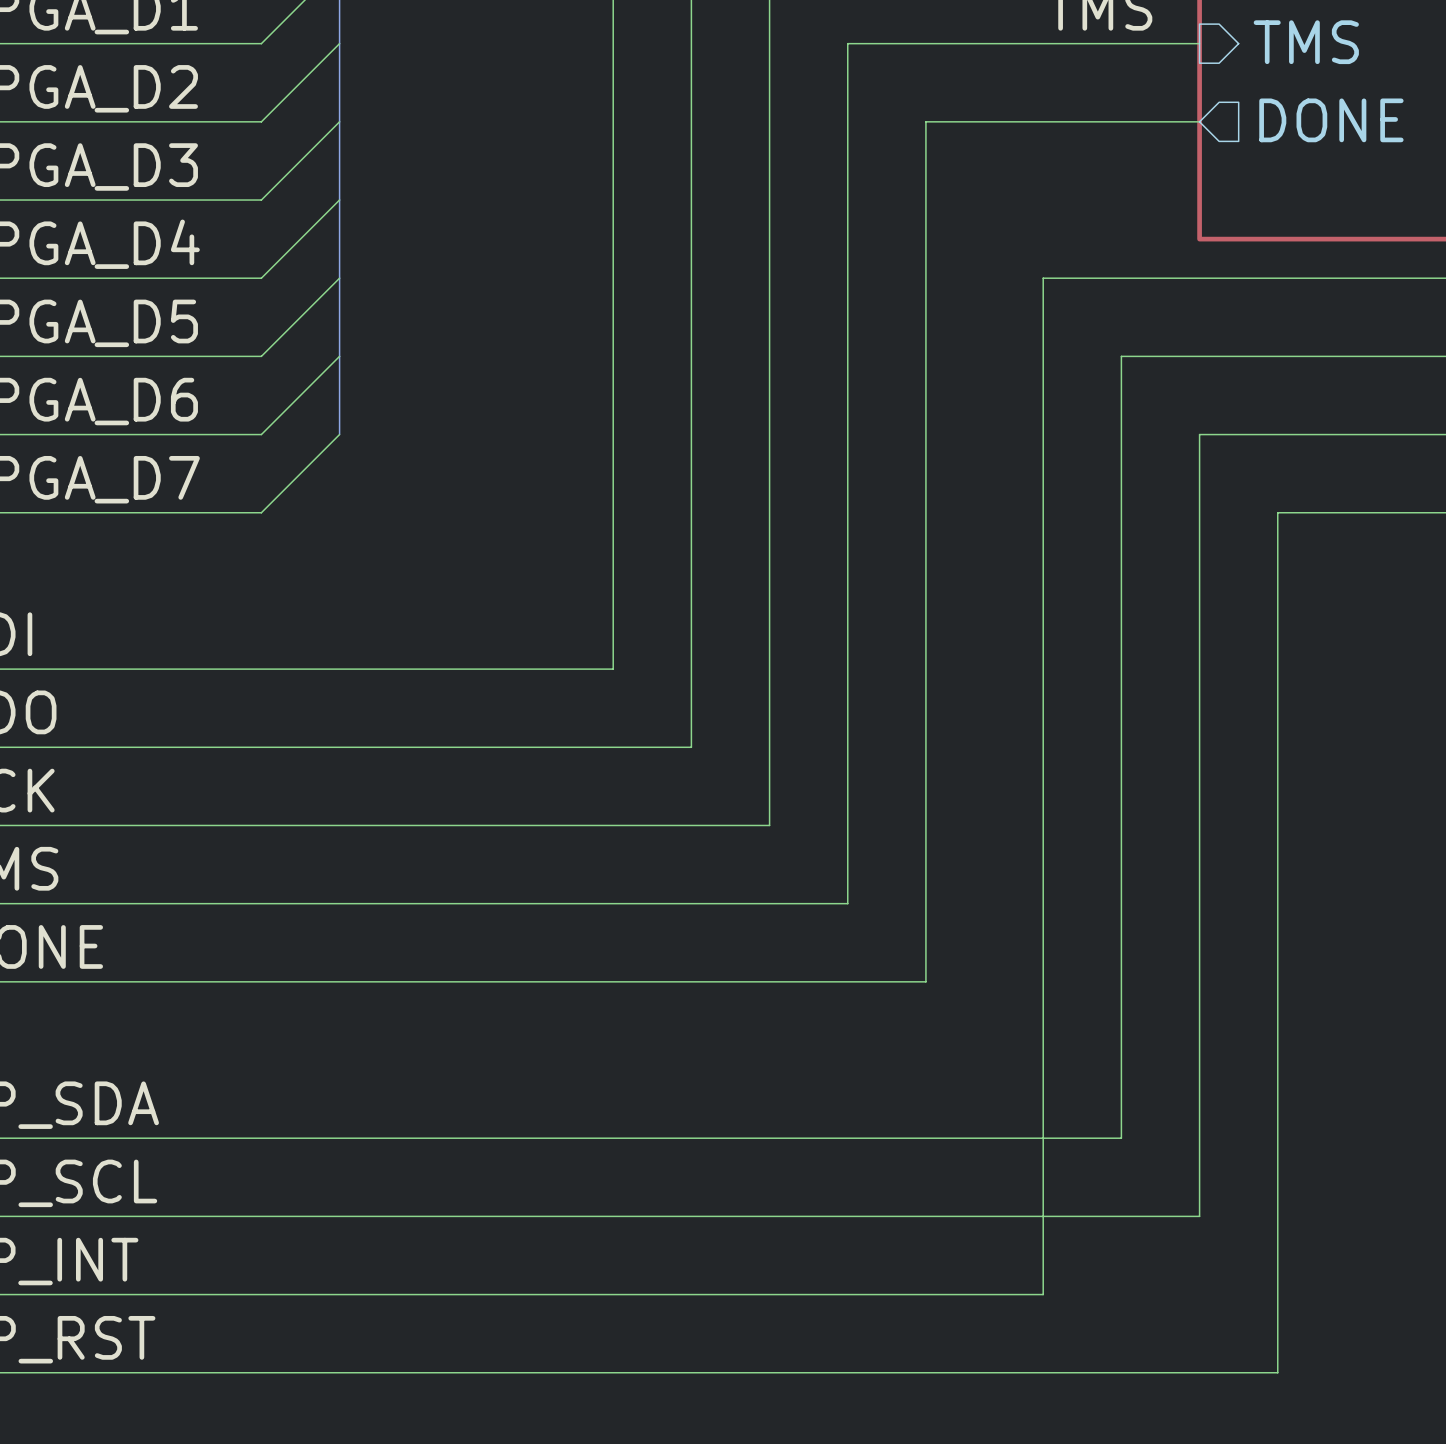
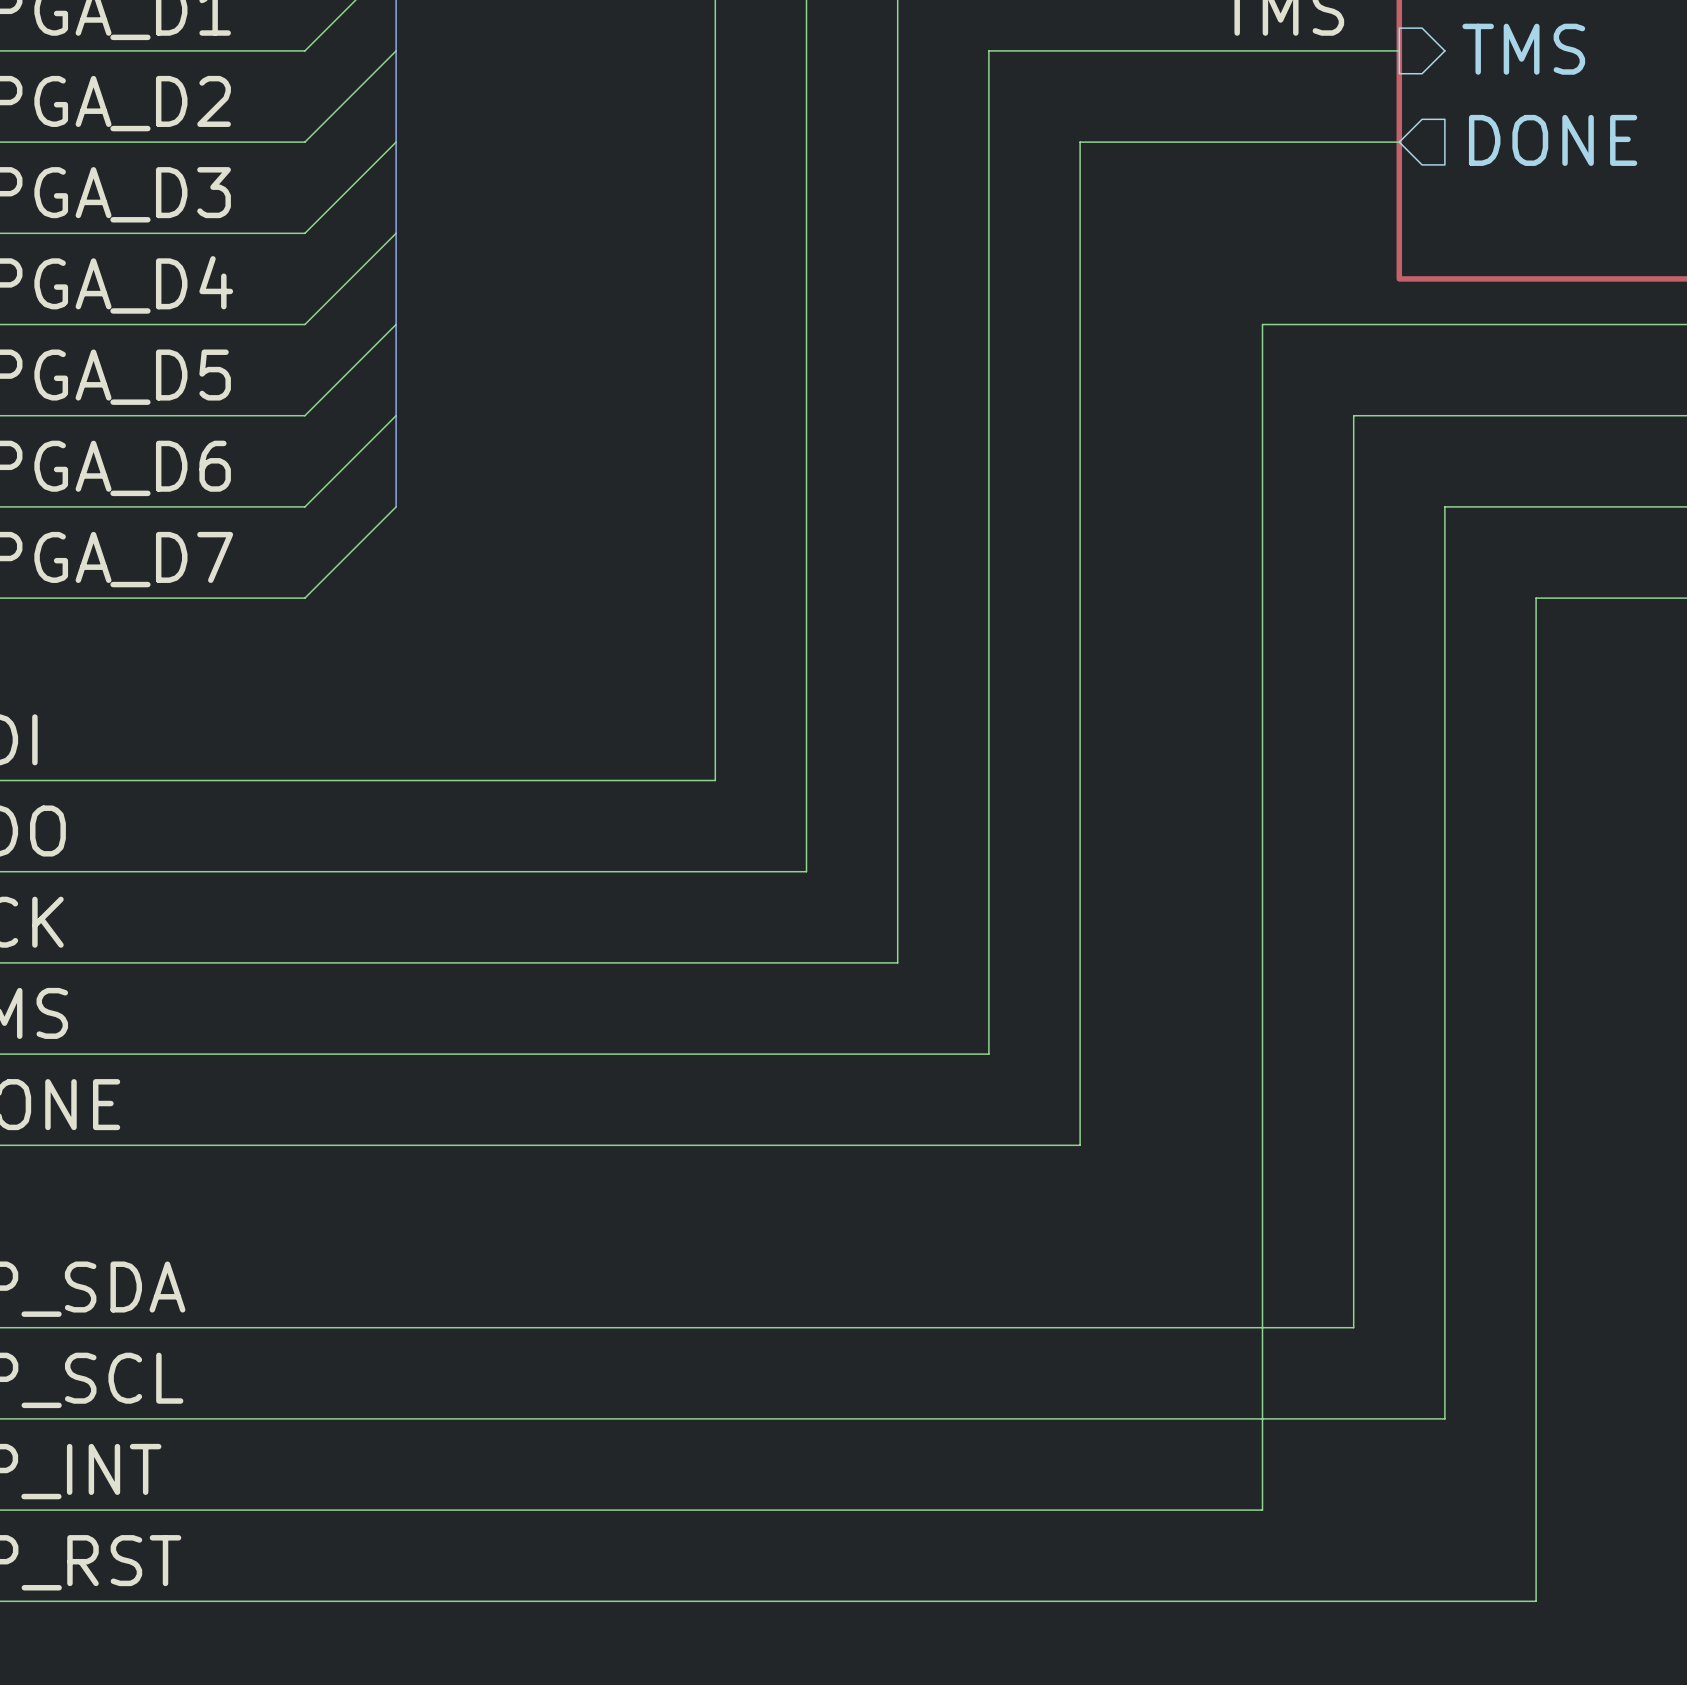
wire: (1082, 278) (1043, 278) (1043, 1294) -> (1262, 324) (1262, 1510) (1216, 1510)
wire: (1160, 356) (1121, 356) (1121, 1138) -> (1353, 415) (1353, 1327) (1308, 1327)
wire: (1238, 434) (1199, 434) (1199, 1216) -> (1444, 506) (1444, 1418) (1399, 1418)
wire: (1316, 512) (1277, 512) (1277, 1372) -> (1536, 598) (1536, 1601) (1490, 1601)

